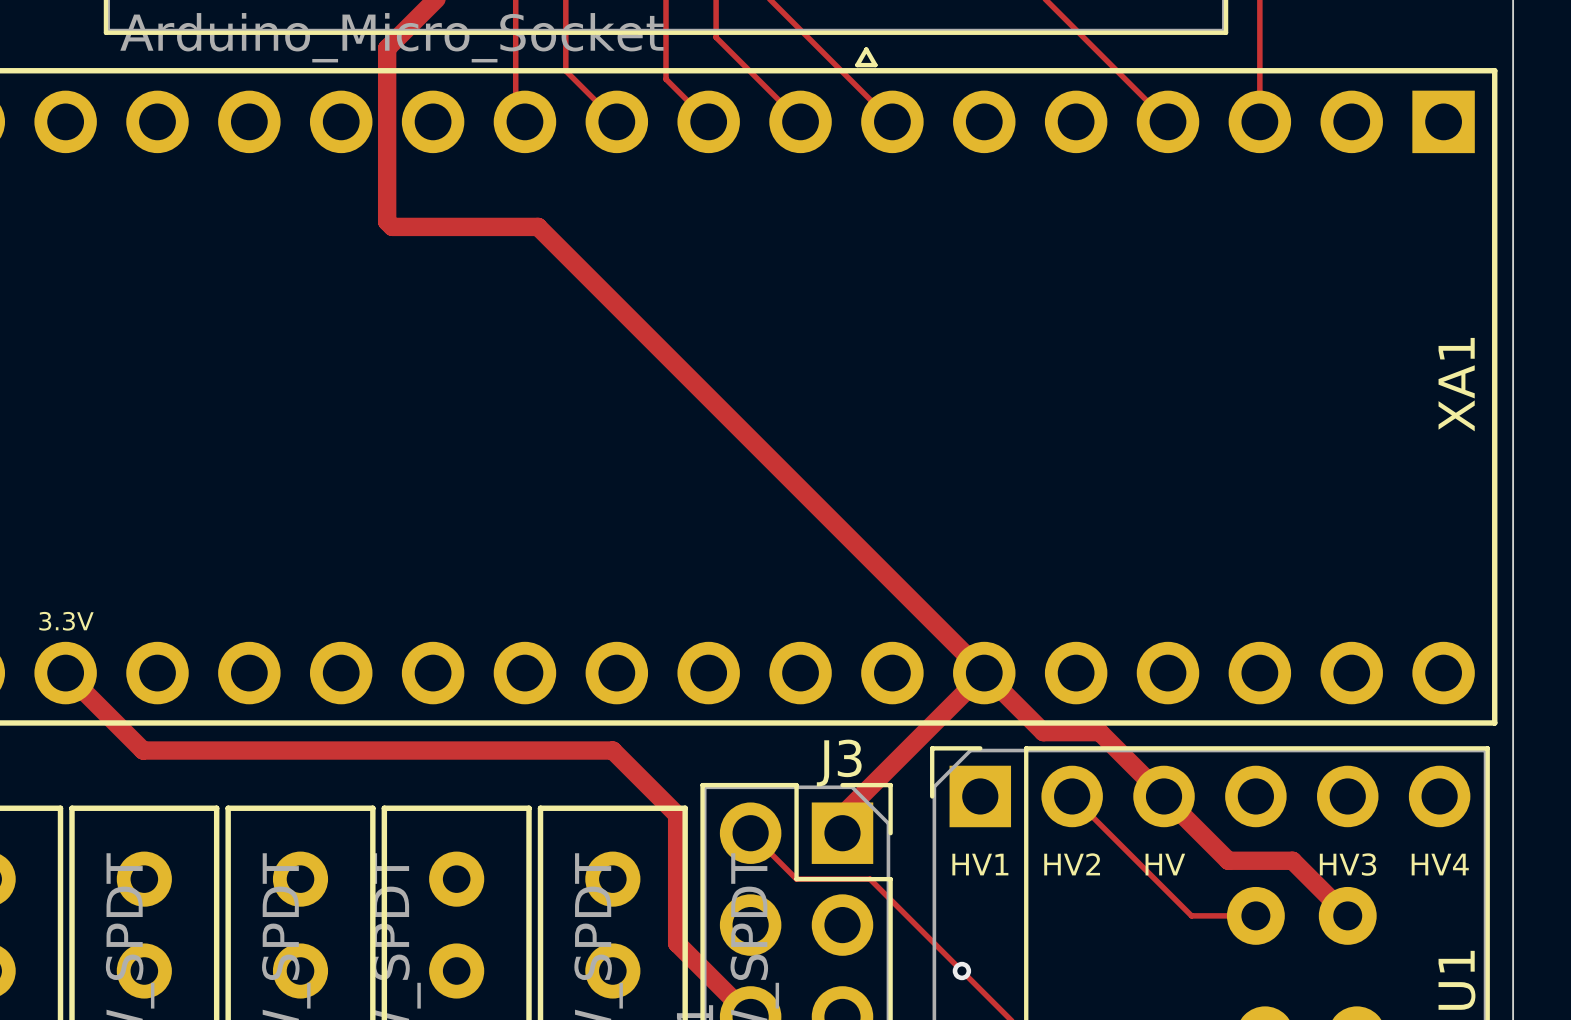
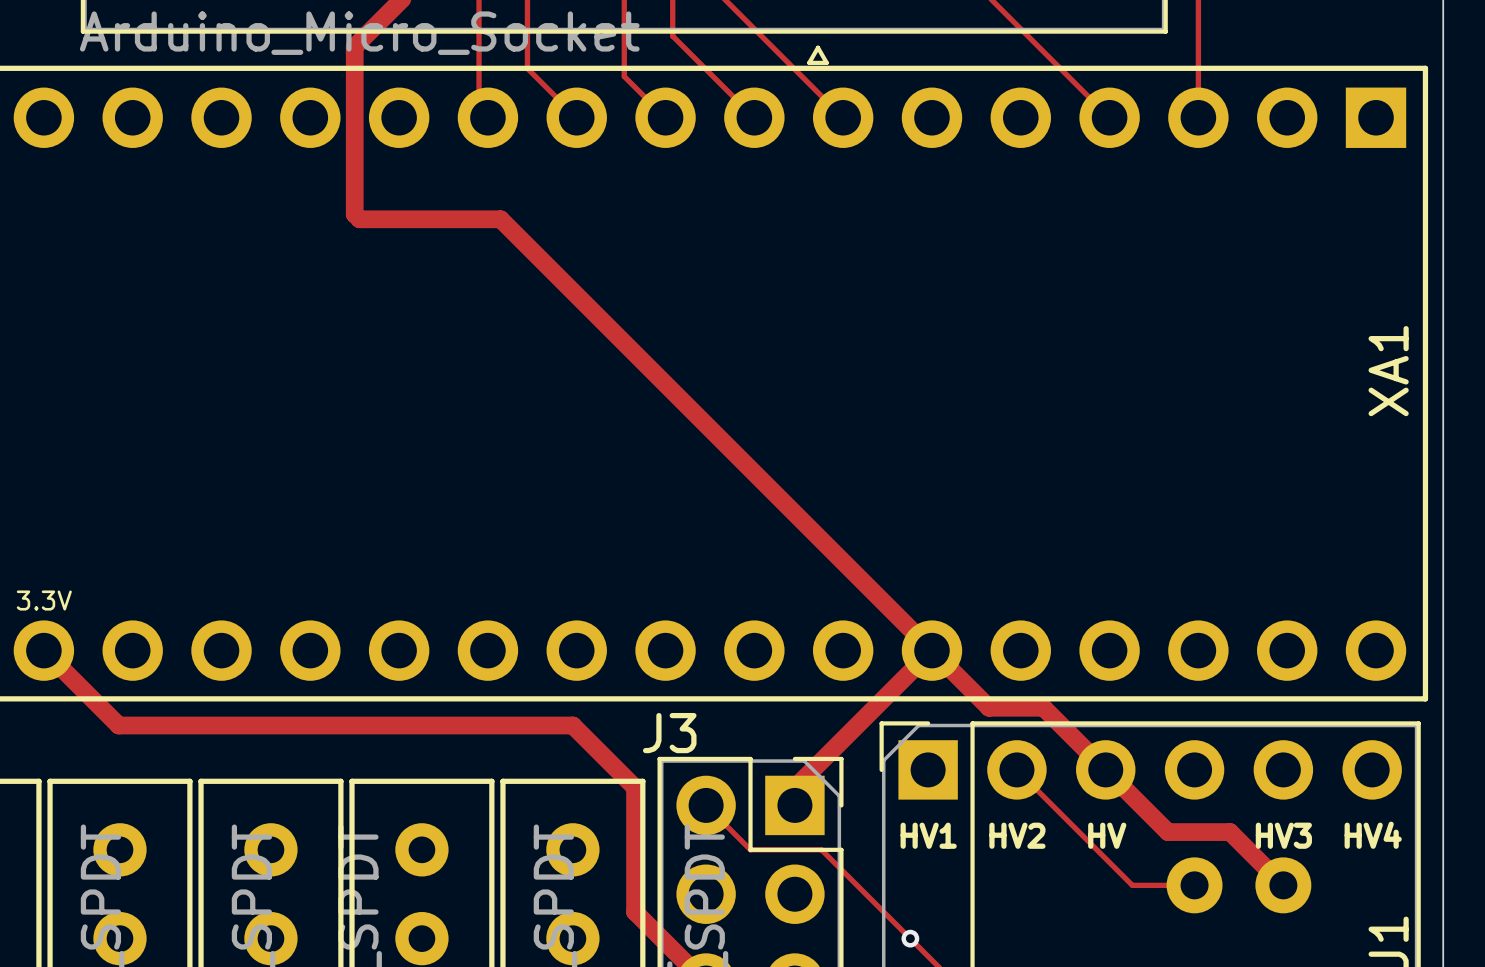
J3 name position: J3 (839, 763) -> J3 (669, 733)

